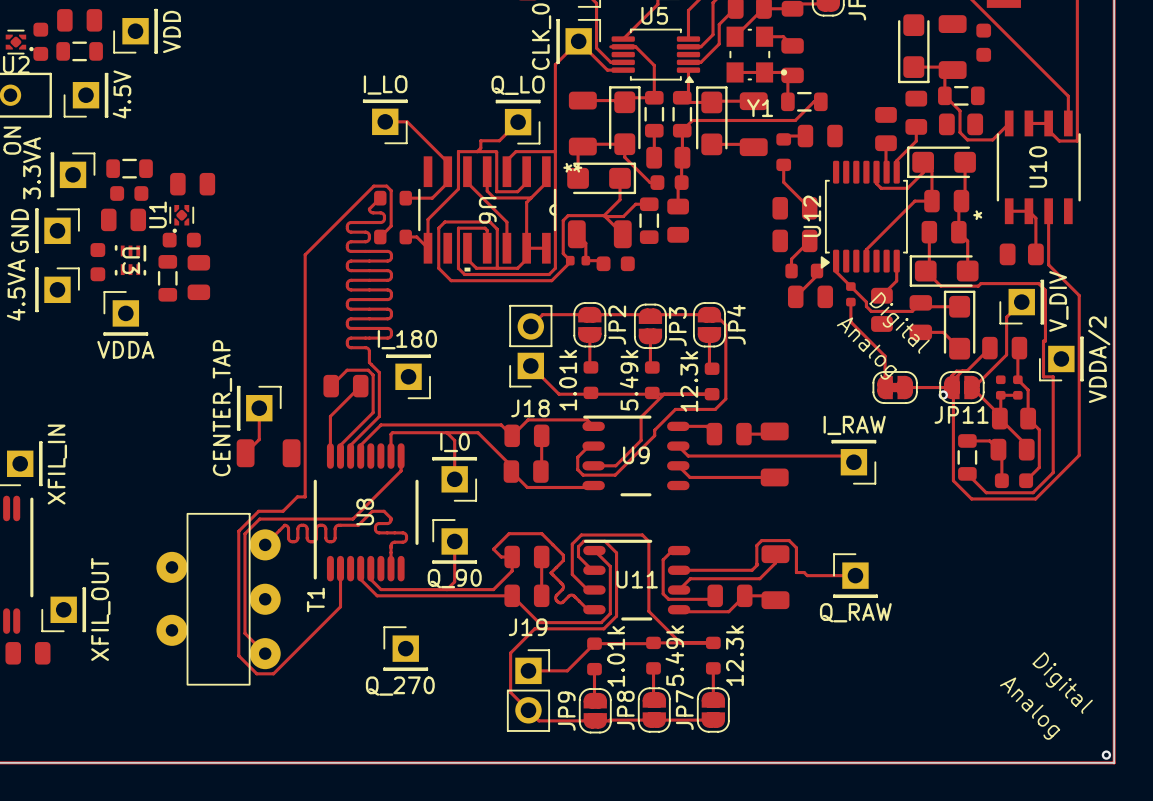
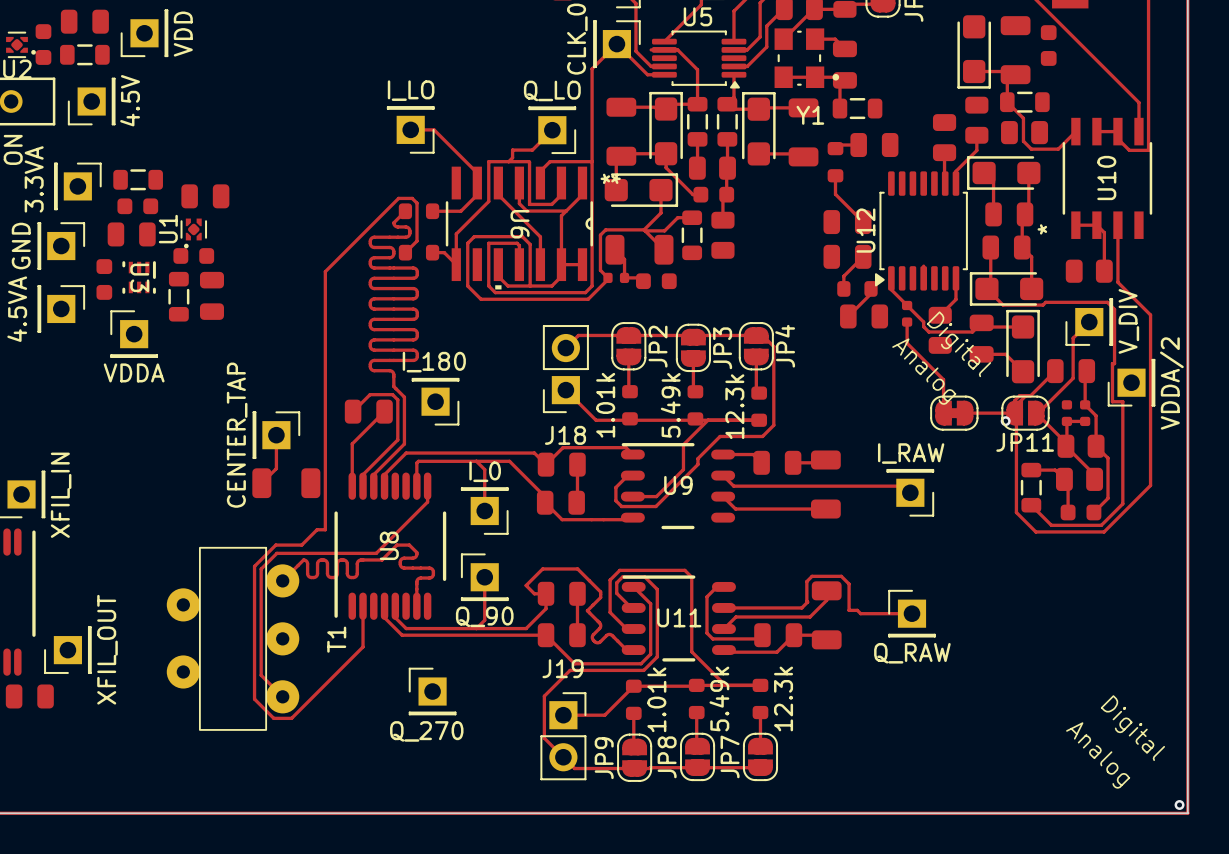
track: (820, 101) (813, 101) (795, 120) (692, 120) (682, 130) -> none
track: (923, 162) (923, 172) (907, 188) (881, 188) (876, 183) (876, 172) -> none
track: (931, 201) (914, 201) (866, 249) -> none

